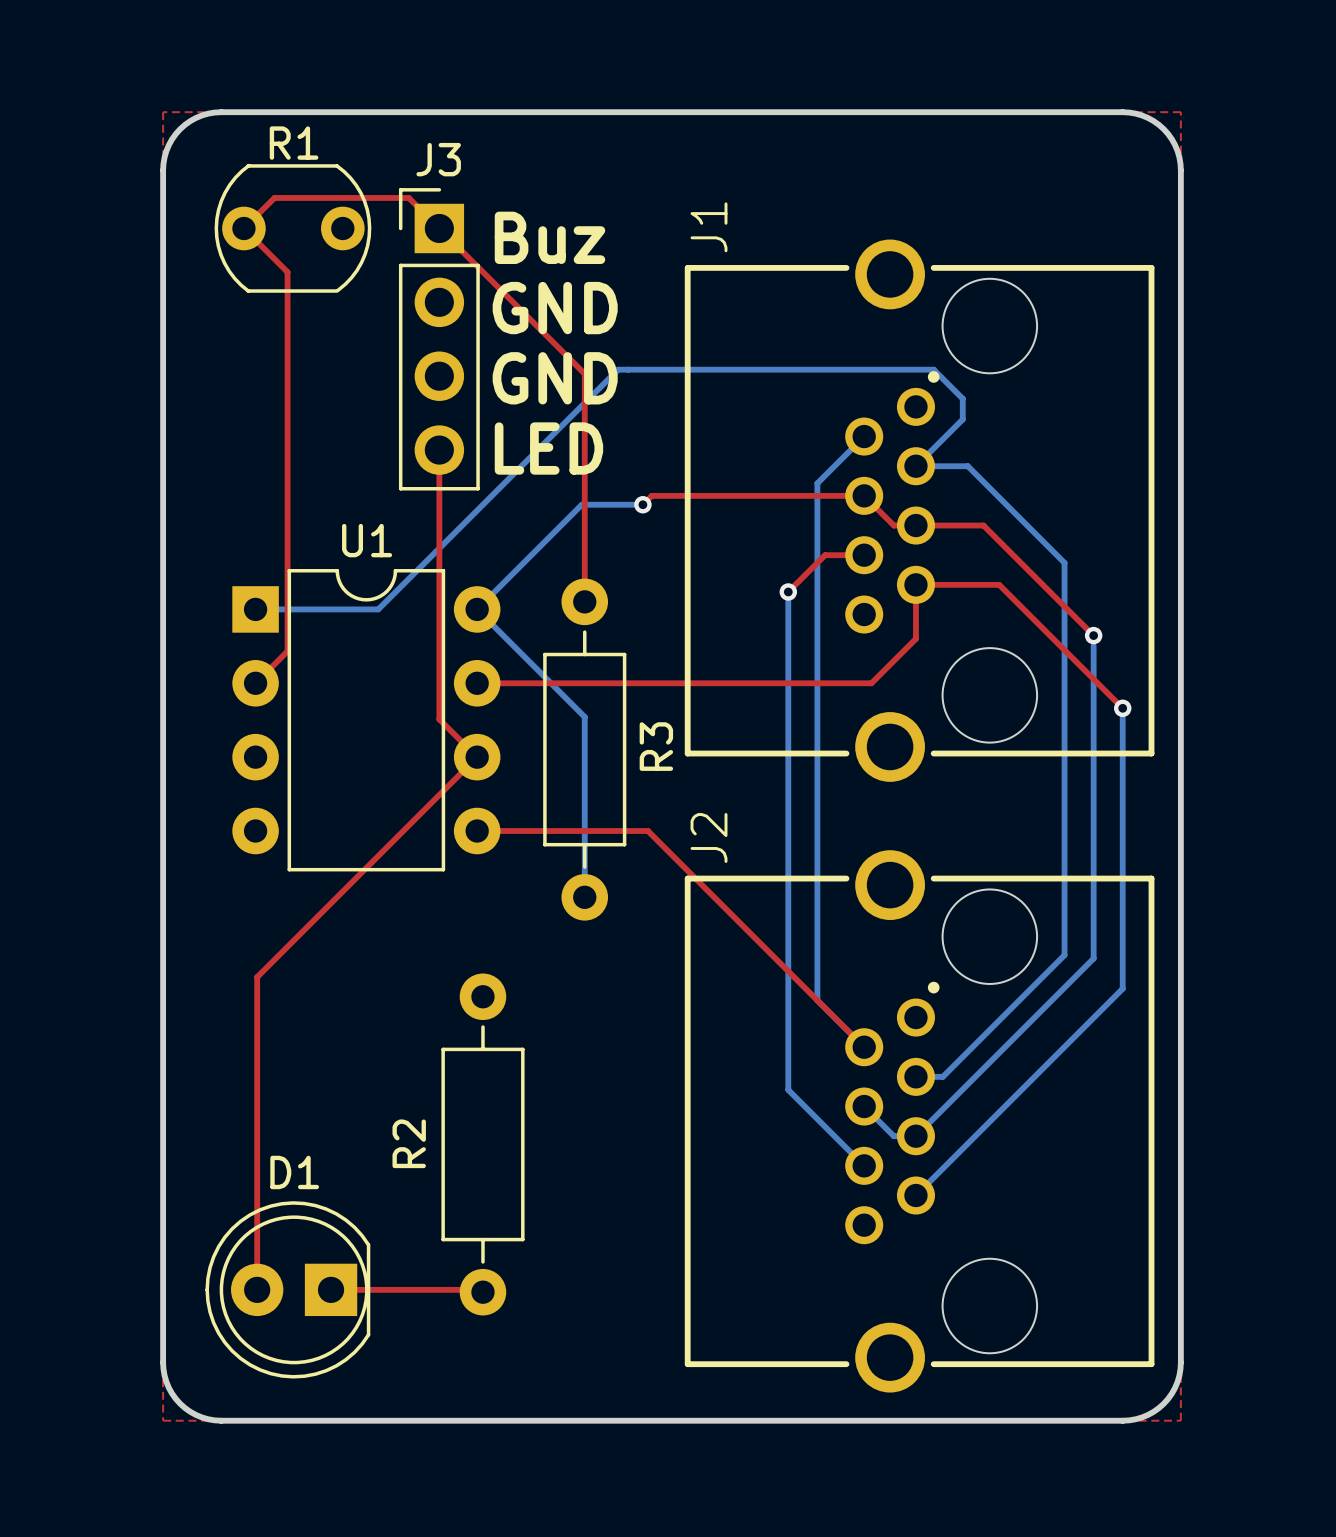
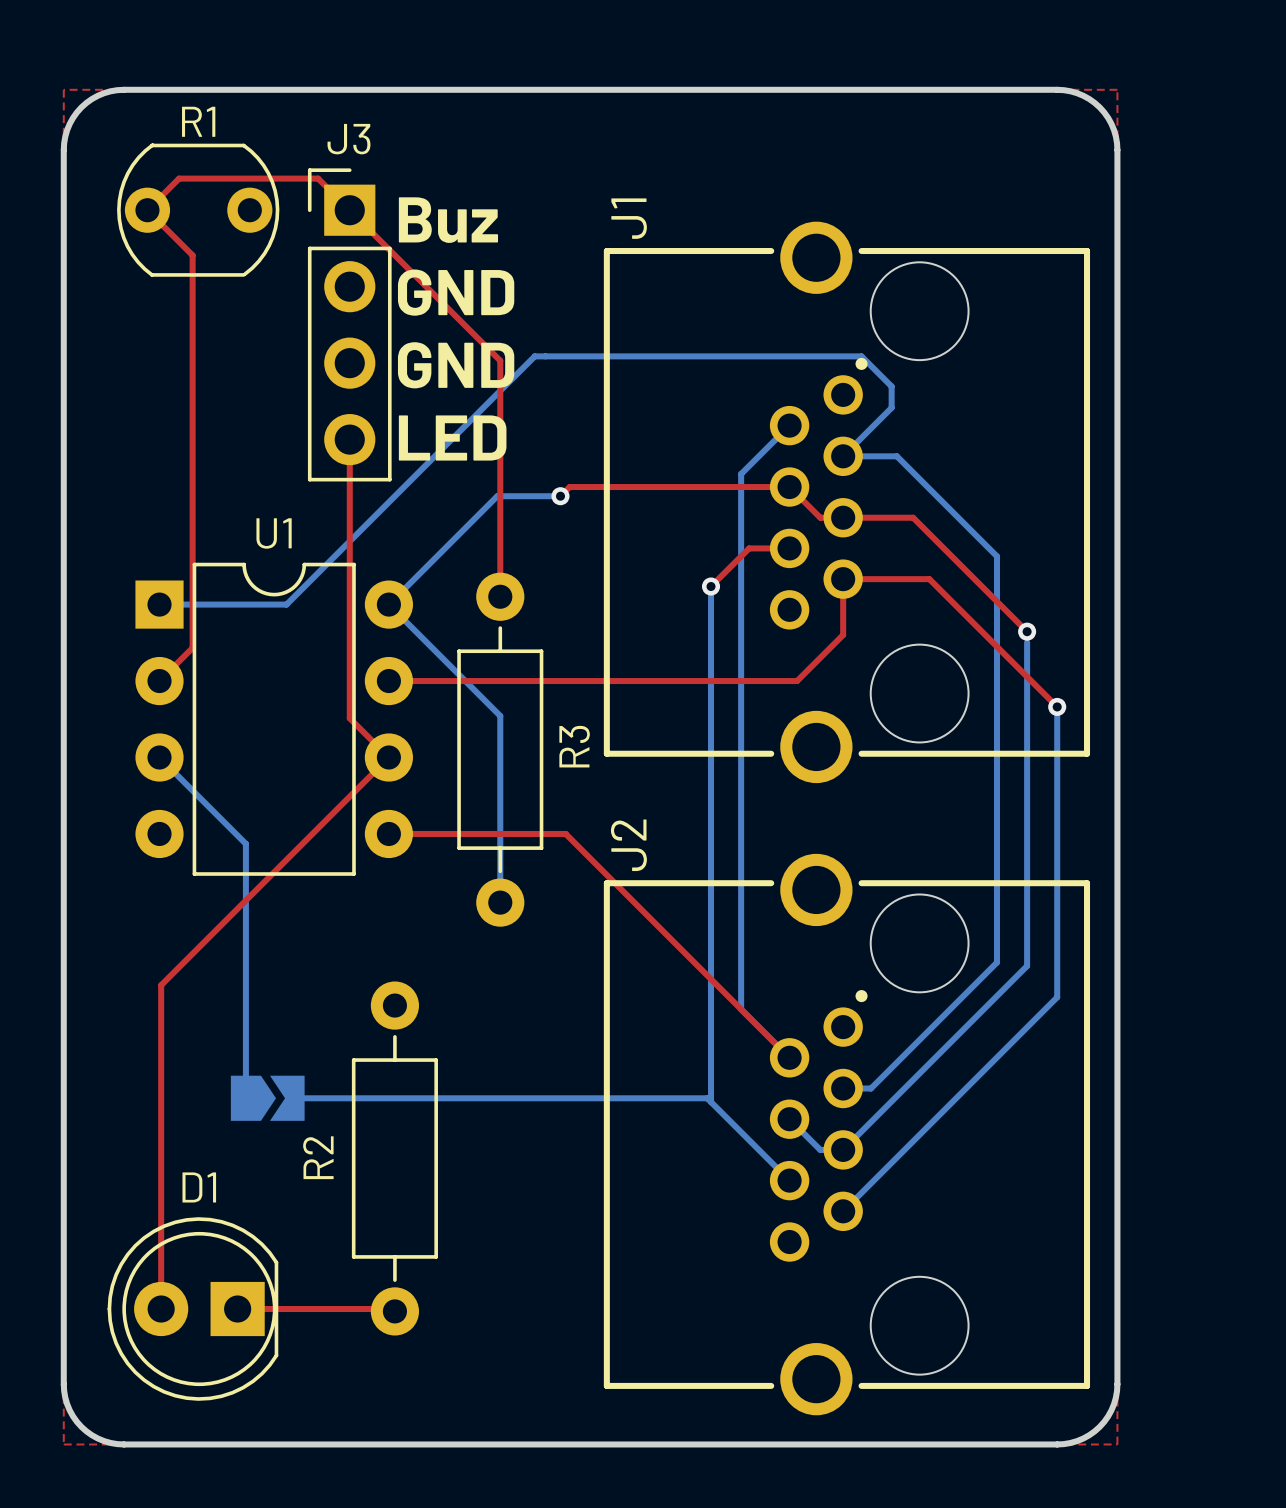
bottom track: none -> (159, 757) (245, 843) (245, 1098)
part: none -> (267, 1098)
bottom track: none -> (289, 1098) (707, 1098) (711, 1102)

